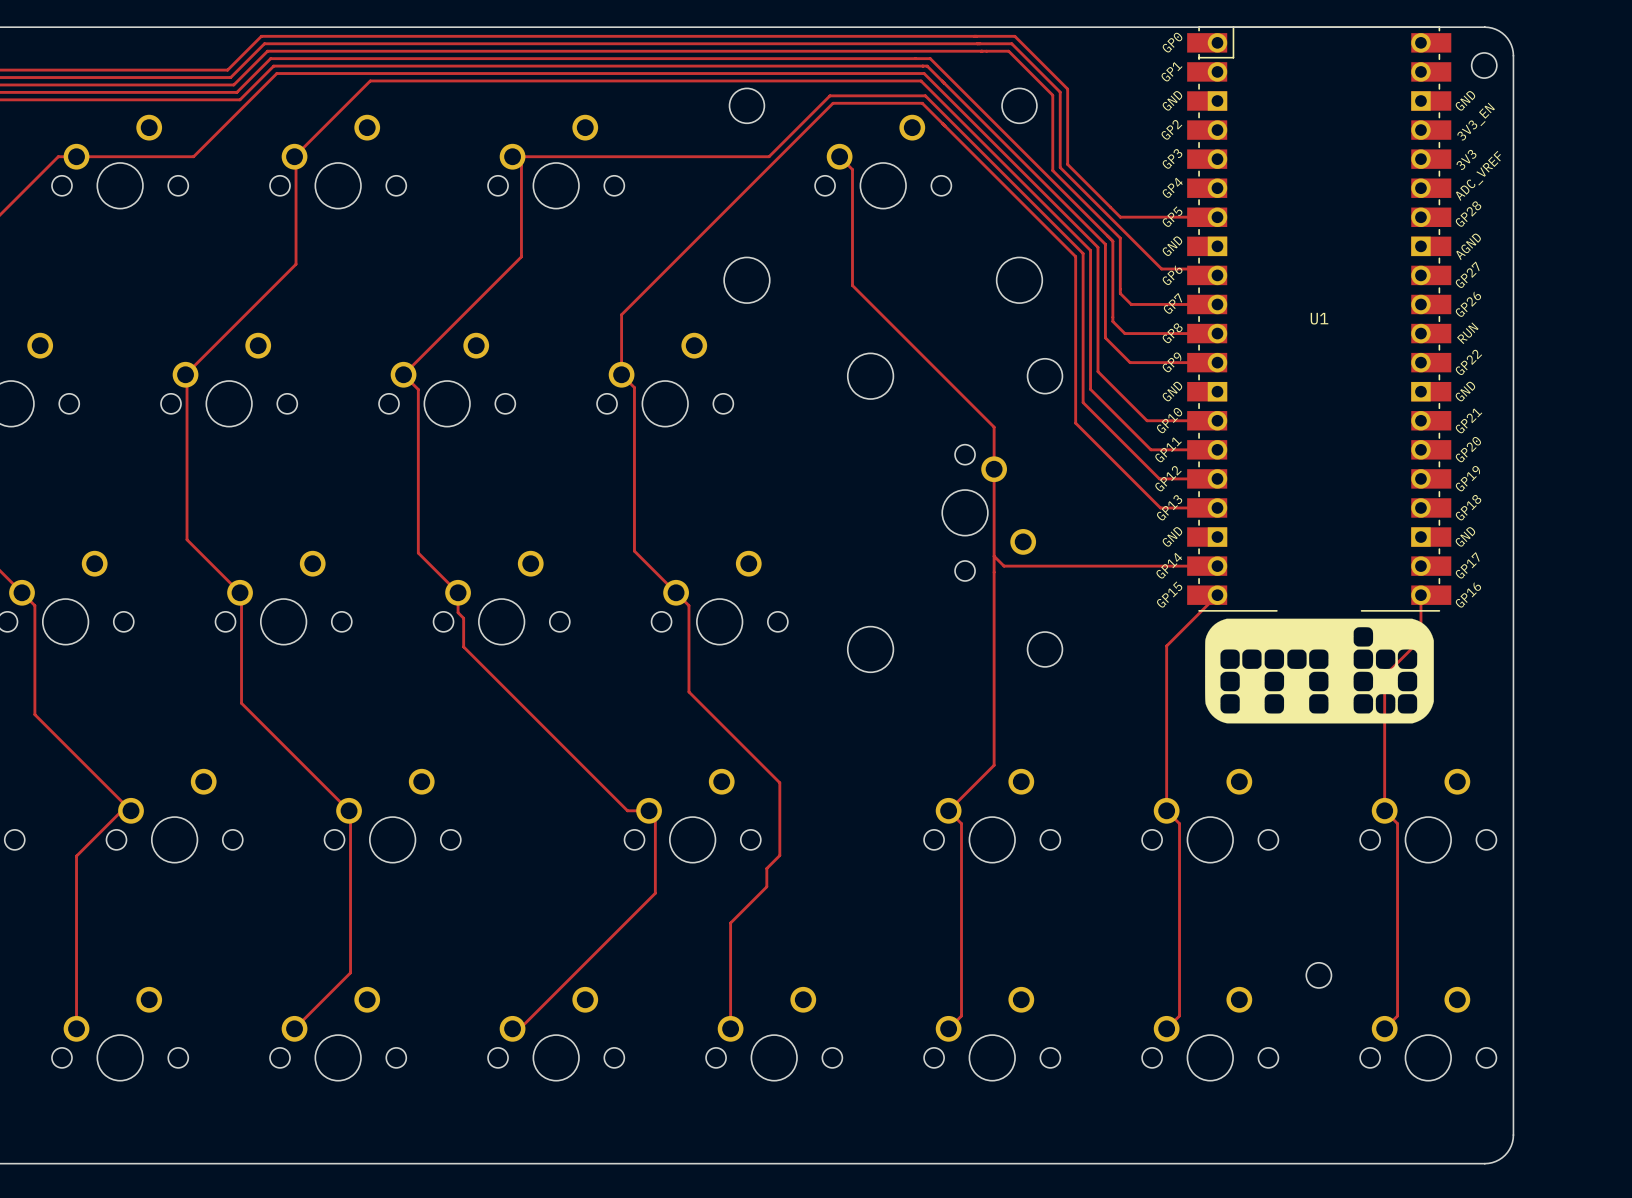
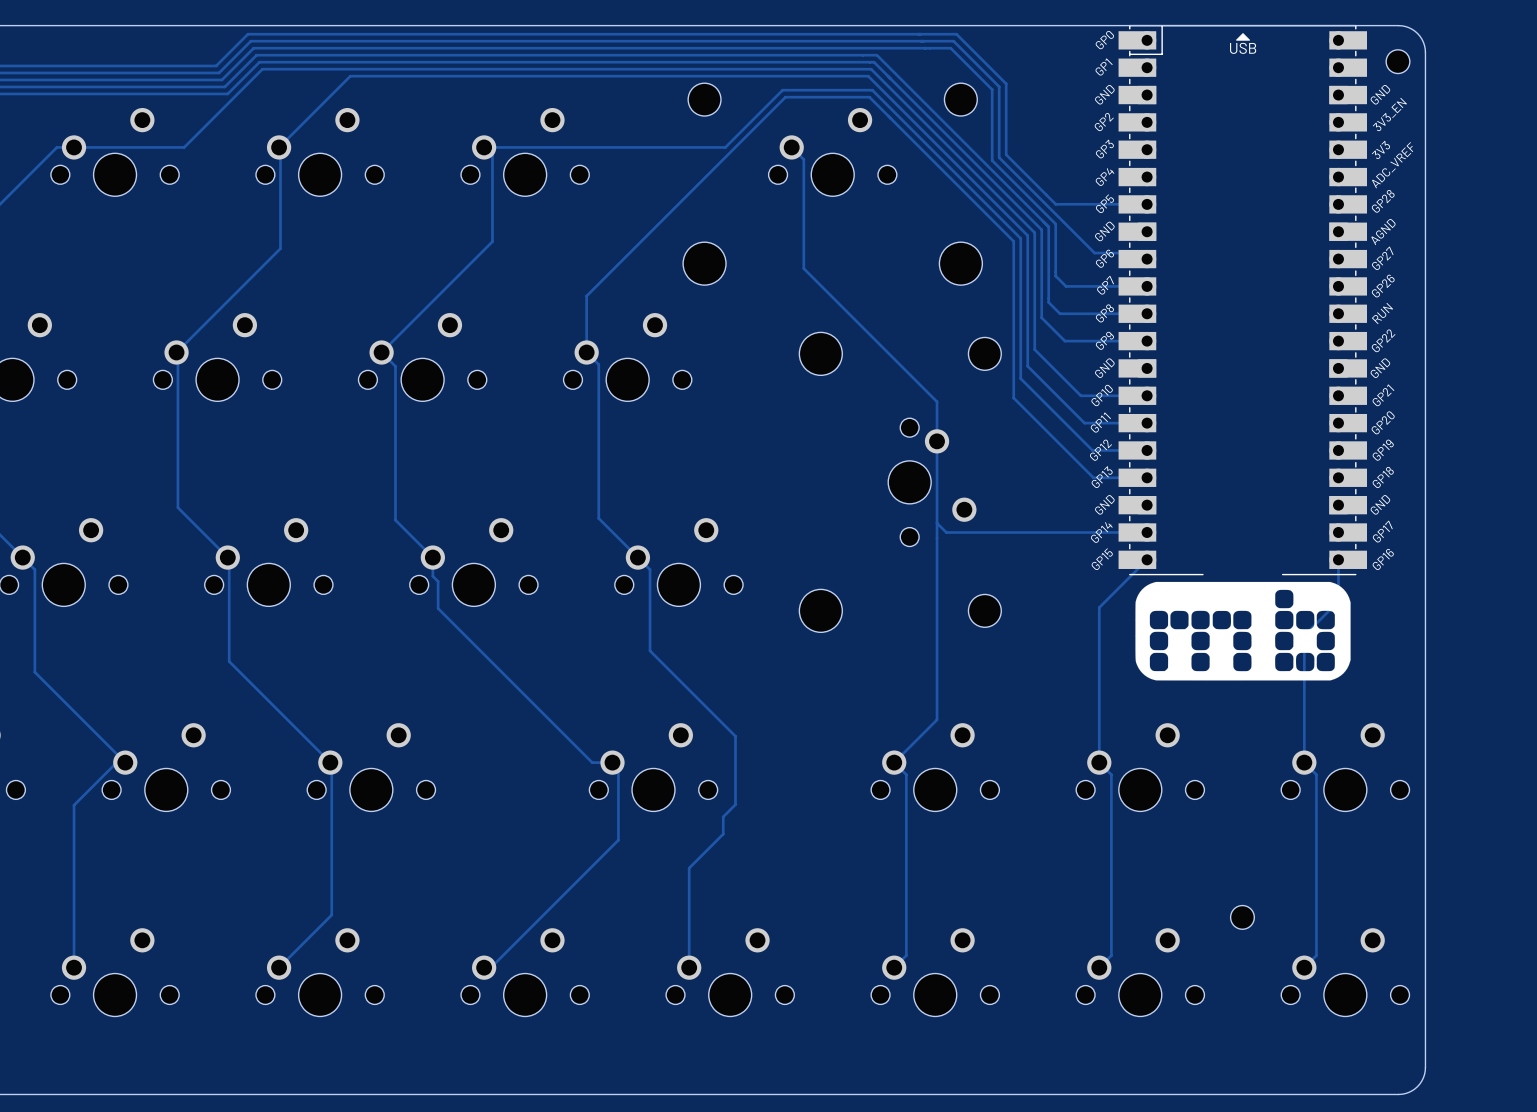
drawing: none -> [1236, 33, 1251, 41]
text: none -> USB (1243, 48)
U1 name: U1 (1319, 318) -> none

